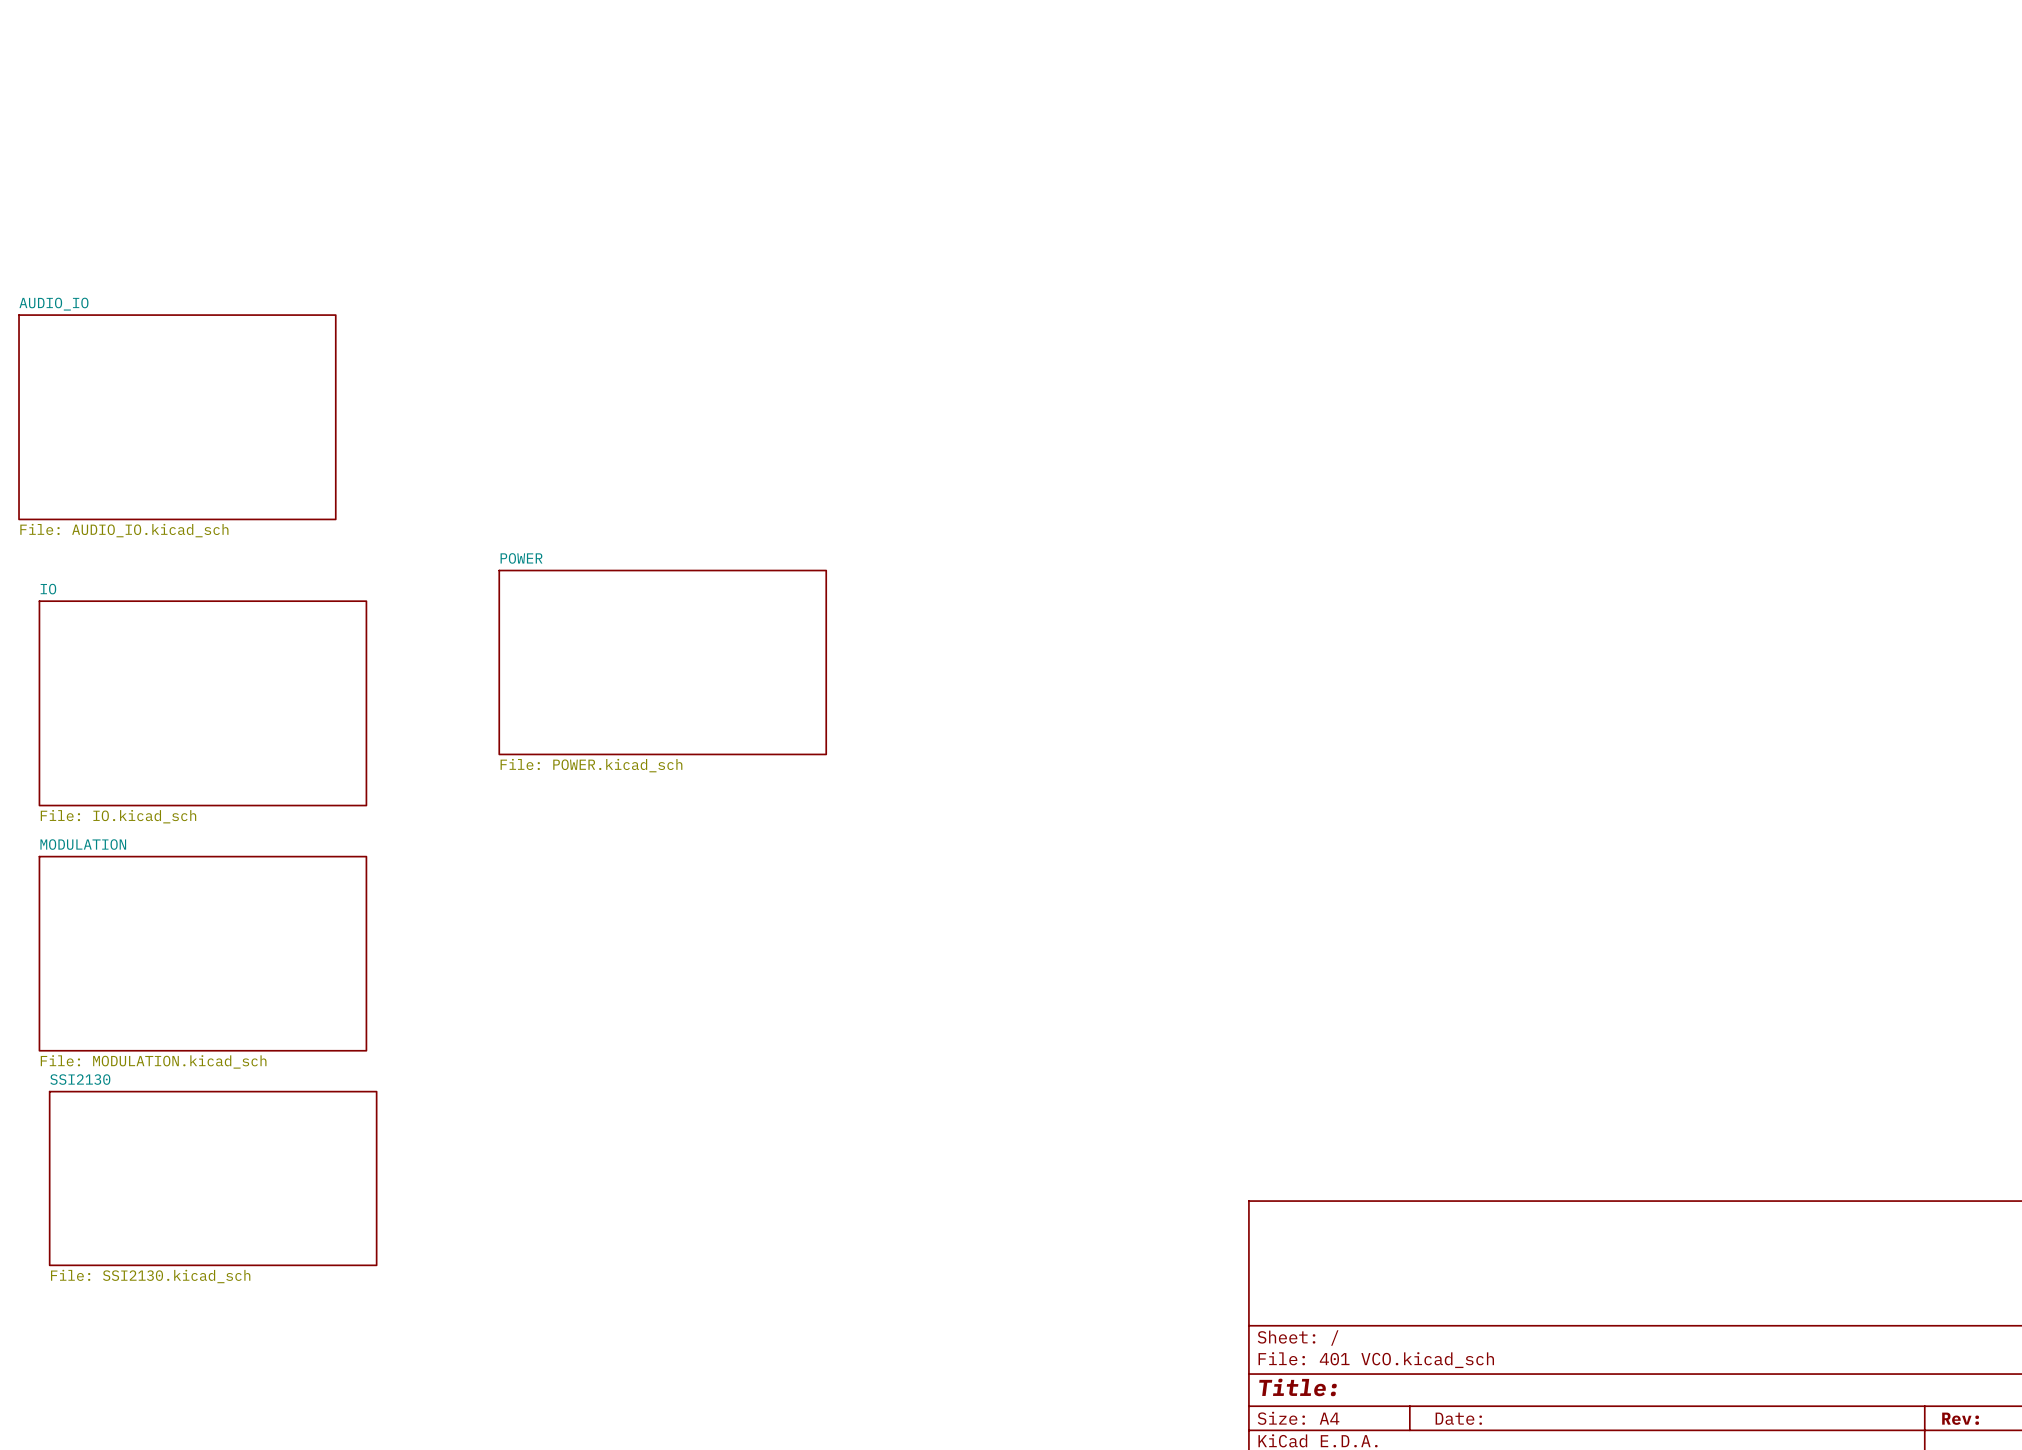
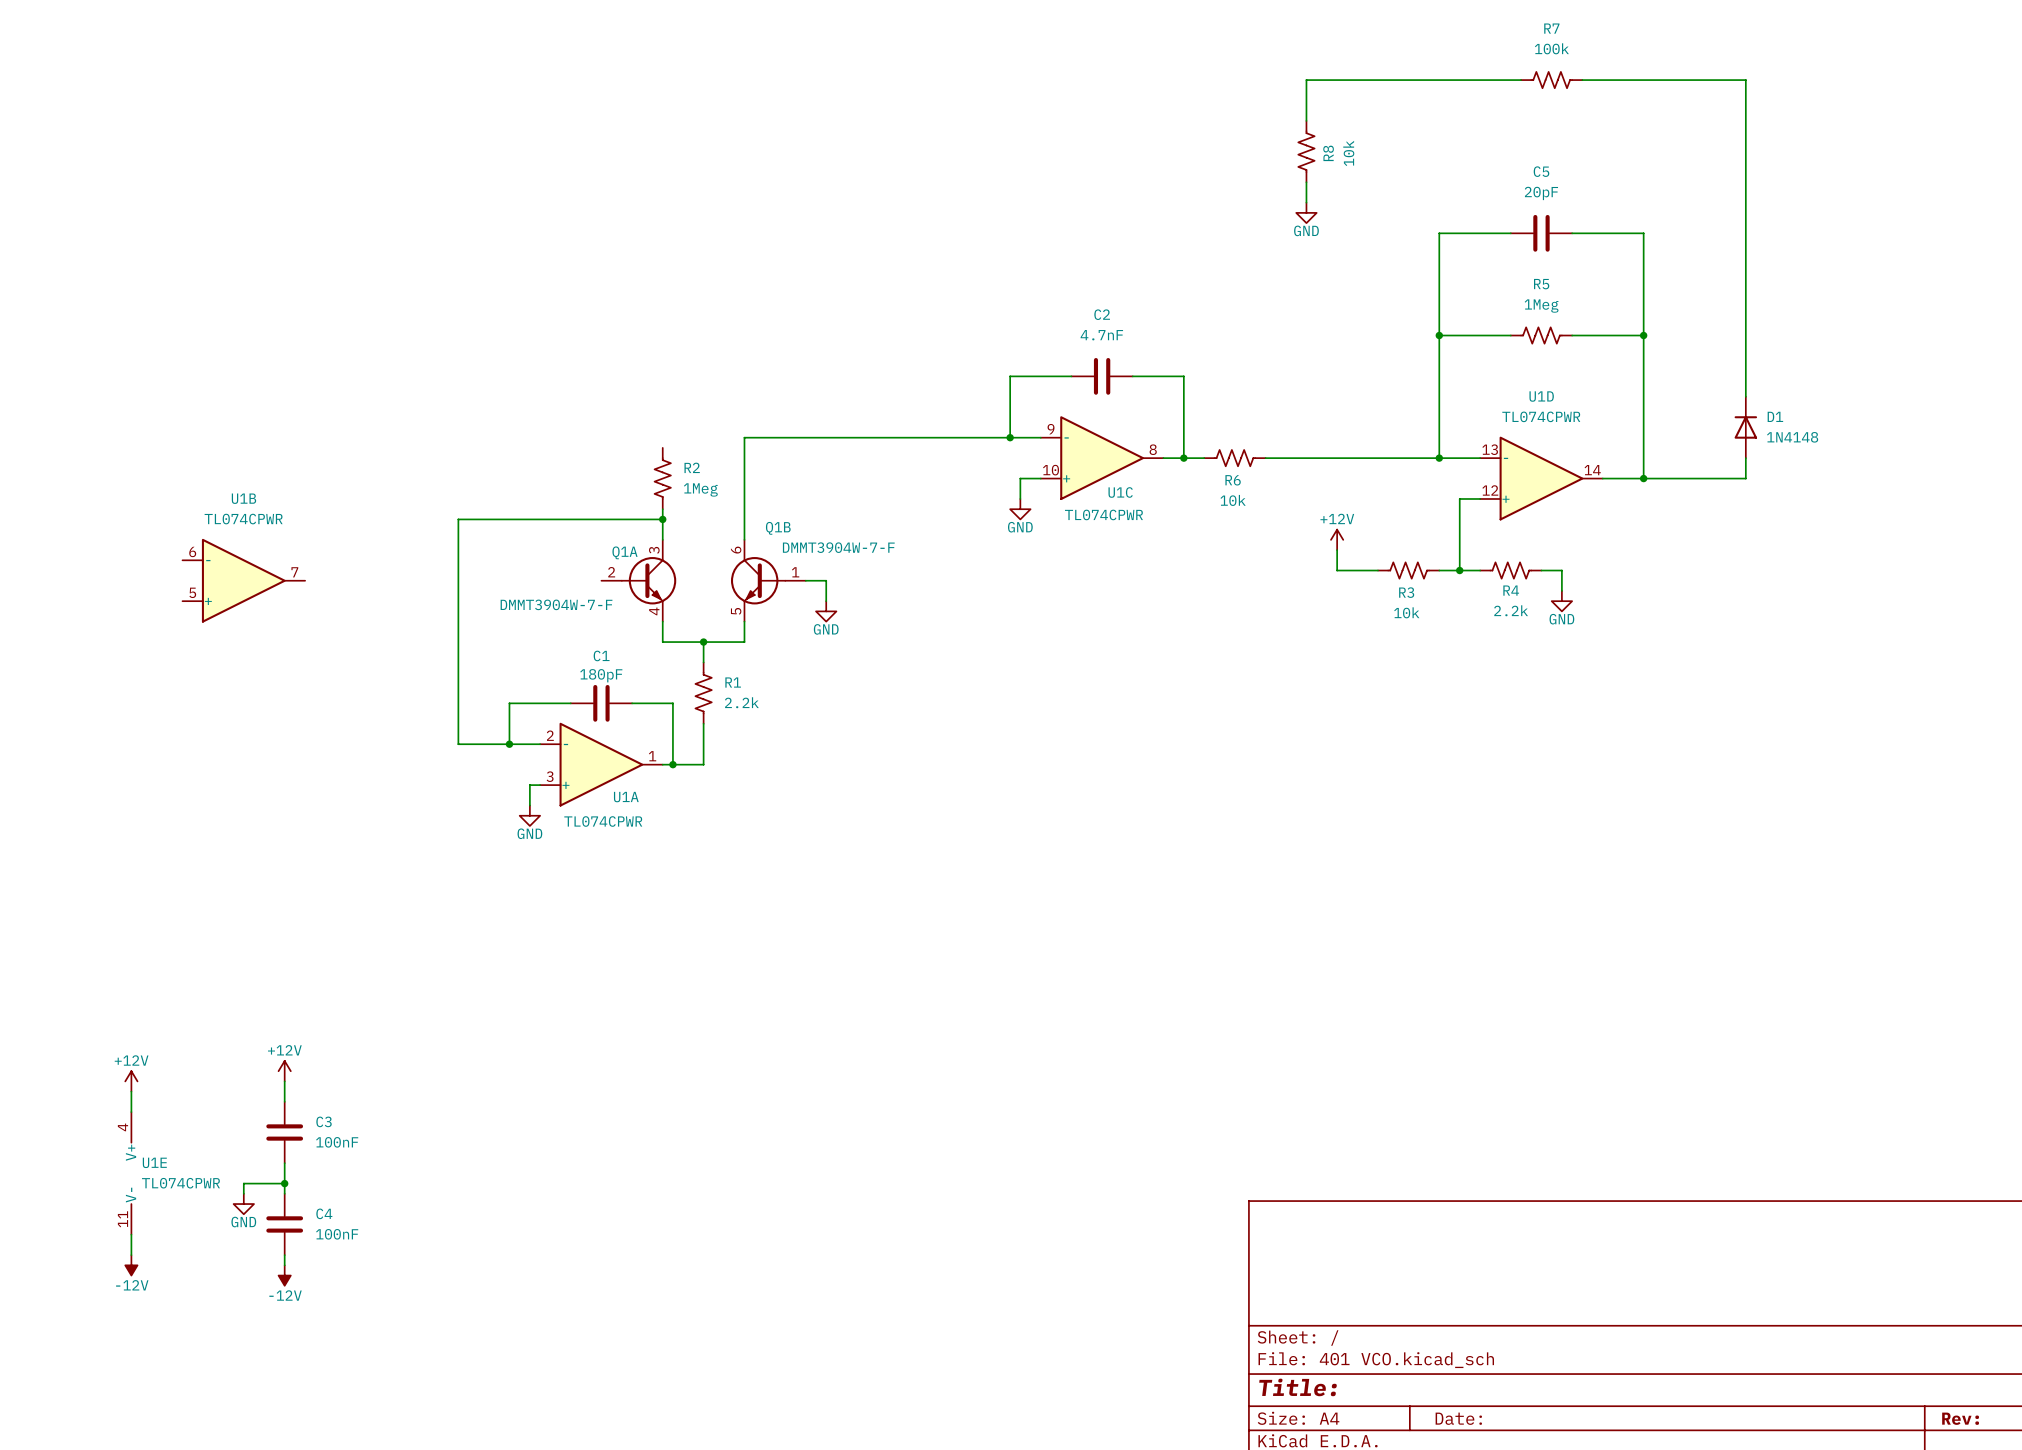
wire: none -> (1521, 80) (1306, 80) (1306, 120)
R7: none -> 100k (1551, 80)
wire: none -> (1582, 80) (1745, 80) (1745, 396)
R8: none -> 10k (1306, 151)
wire: none -> (1306, 182) (1306, 202)
power symbol: none -> GND (1306, 212)
wire: none -> (1510, 233) (1439, 233) (1439, 458)
C5: none -> 20pF (1541, 233)
wire: none -> (1572, 233) (1643, 233) (1643, 478)
wire: none -> (1439, 335) (1510, 335)
junction: none -> (1439, 335)
R5: none -> 1Meg (1541, 335)
wire: none -> (1572, 335) (1643, 335)
junction: none -> (1643, 335)
wire: none -> (1071, 376) (1010, 376) (1010, 437)
C2: none -> 4.7nF (1102, 376)
wire: none -> (1132, 376) (1183, 376) (1183, 458)
sheet AUDIO_IO: File: AUDIO_IO.kicad_sch (177, 417) -> none
D1: none -> 1N4148 (1745, 427)
junction: none -> (1010, 437)
wire: none -> (1040, 437) (744, 437) (744, 539)
U1C: none -> TL074CPWR (1102, 458)
wire: none -> (1163, 458) (1204, 458)
junction: none -> (1183, 458)
R6: none -> 10k (1234, 458)
wire: none -> (1265, 458) (1480, 458)
junction: none -> (1439, 458)
wire: none -> (1745, 458) (1745, 478) (1602, 478)
R2: none -> 1Meg (662, 478)
wire: none -> (1040, 478) (1020, 478) (1020, 498)
U1D: none -> TL074CPWR (1541, 478)
junction: none -> (1643, 478)
wire: none -> (1480, 498) (1459, 498) (1459, 570)
wire: none -> (662, 509) (662, 539)
power symbol: none -> GND (1020, 509)
wire: none -> (662, 519) (458, 519) (458, 744) (540, 744)
junction: none -> (662, 519)
power symbol: none -> +12V (1337, 539)
wire: none -> (1337, 550) (1337, 570) (1377, 570)
R3: none -> 10k (1408, 570)
wire: none -> (1439, 570) (1480, 570)
junction: none -> (1459, 570)
R4: none -> 2.2k (1510, 570)
wire: none -> (1541, 570) (1561, 570) (1561, 590)
U1B: none -> TL074CPWR (243, 580)
Q1A: none -> DMMT3904W-7-F (638, 580)
Q1B: none -> DMMT3904W-7-F (768, 580)
wire: none -> (805, 580) (826, 580) (826, 601)
power symbol: none -> GND (1561, 601)
power symbol: none -> GND (826, 611)
wire: none -> (662, 621) (662, 642) (744, 642) (744, 621)
wire: none -> (703, 642) (703, 662)
junction: none -> (703, 642)
sheet POWER: File: POWER.kicad_sch (662, 662) -> none
R1: none -> 2.2k (703, 693)
sheet IO: File: IO.kicad_sch (202, 703) -> none
wire: none -> (570, 703) (509, 703) (509, 744)
C1: none -> 180pF (601, 703)
wire: none -> (632, 703) (672, 703) (672, 764)
wire: none -> (703, 723) (703, 764) (662, 764)
junction: none -> (509, 744)
U1A: none -> TL074CPWR (601, 764)
junction: none -> (672, 764)
wire: none -> (540, 785) (529, 785) (529, 805)
power symbol: none -> GND (529, 815)
sheet MODULATION: File: MODULATION.kicad_sch (202, 953) -> none
power symbol: none -> +12V (284, 1071)
power symbol: none -> +12V (131, 1081)
wire: none -> (284, 1081) (284, 1101)
wire: none -> (131, 1091) (131, 1112)
C3: none -> 100nF (284, 1132)
wire: none -> (284, 1163) (284, 1193)
U1E: none -> TL074CPWR (131, 1173)
sheet SSI2130: File: SSI2130.kicad_sch (213, 1178) -> none
wire: none -> (284, 1183) (243, 1183) (243, 1193)
junction: none -> (284, 1183)
power symbol: none -> GND (243, 1204)
C4: none -> 100nF (284, 1224)
wire: none -> (131, 1234) (131, 1255)
wire: none -> (284, 1255) (284, 1265)
power symbol: none -> -12V (131, 1265)
power symbol: none -> -12V (284, 1275)

